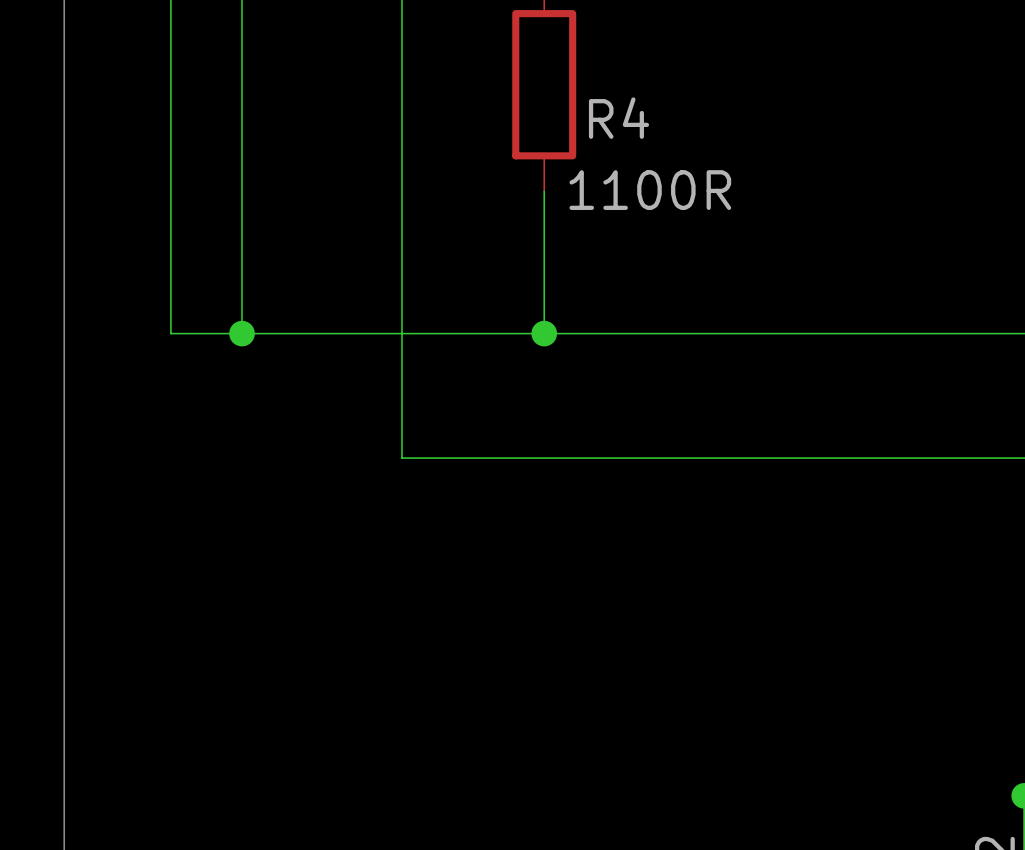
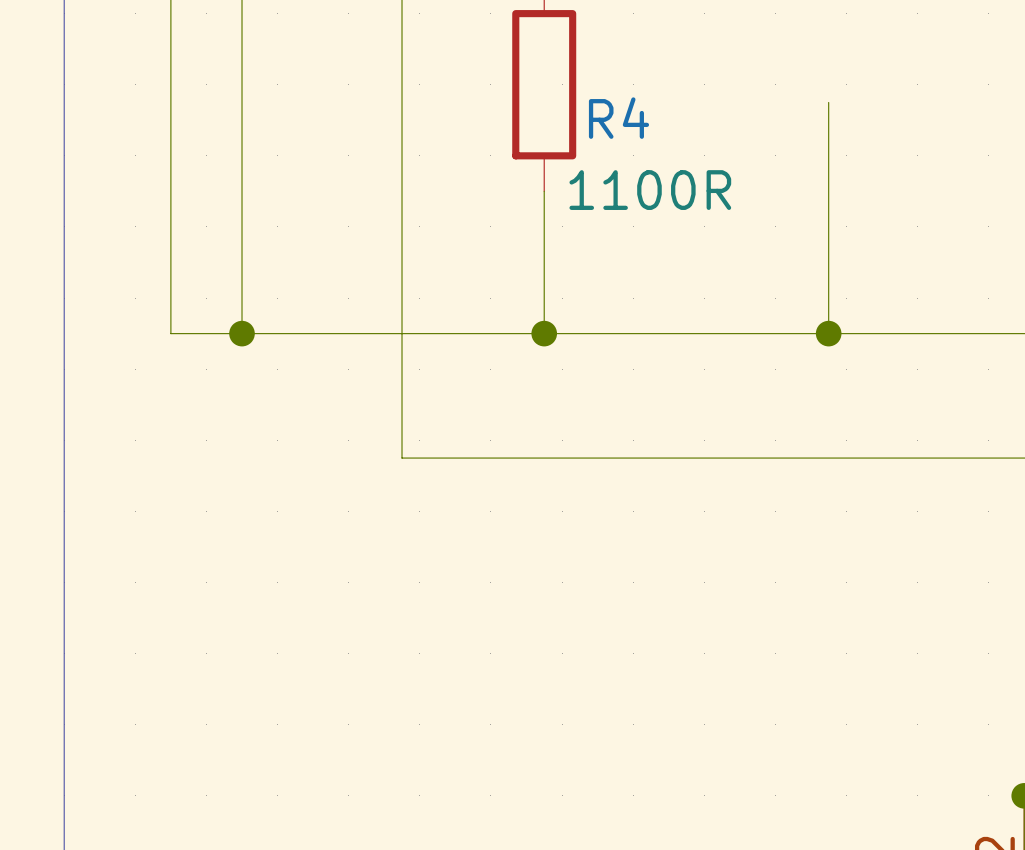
wire: none -> (828, 102) (828, 333)
junction: none -> (828, 333)

